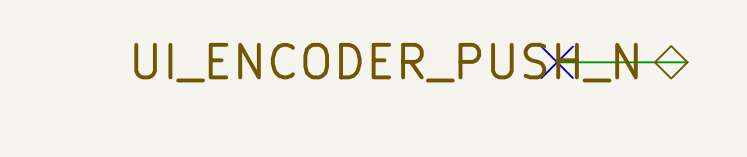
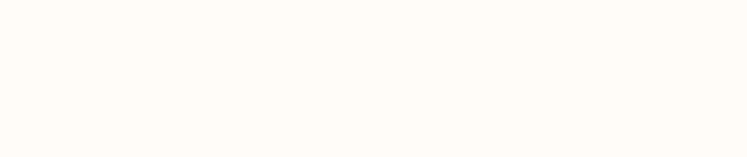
hierarchical label: UI_ENCODER_PUSH_N (386, 62) -> none
wire: (557, 62) (687, 62) -> none
no-connect mark: (557, 62) -> none

